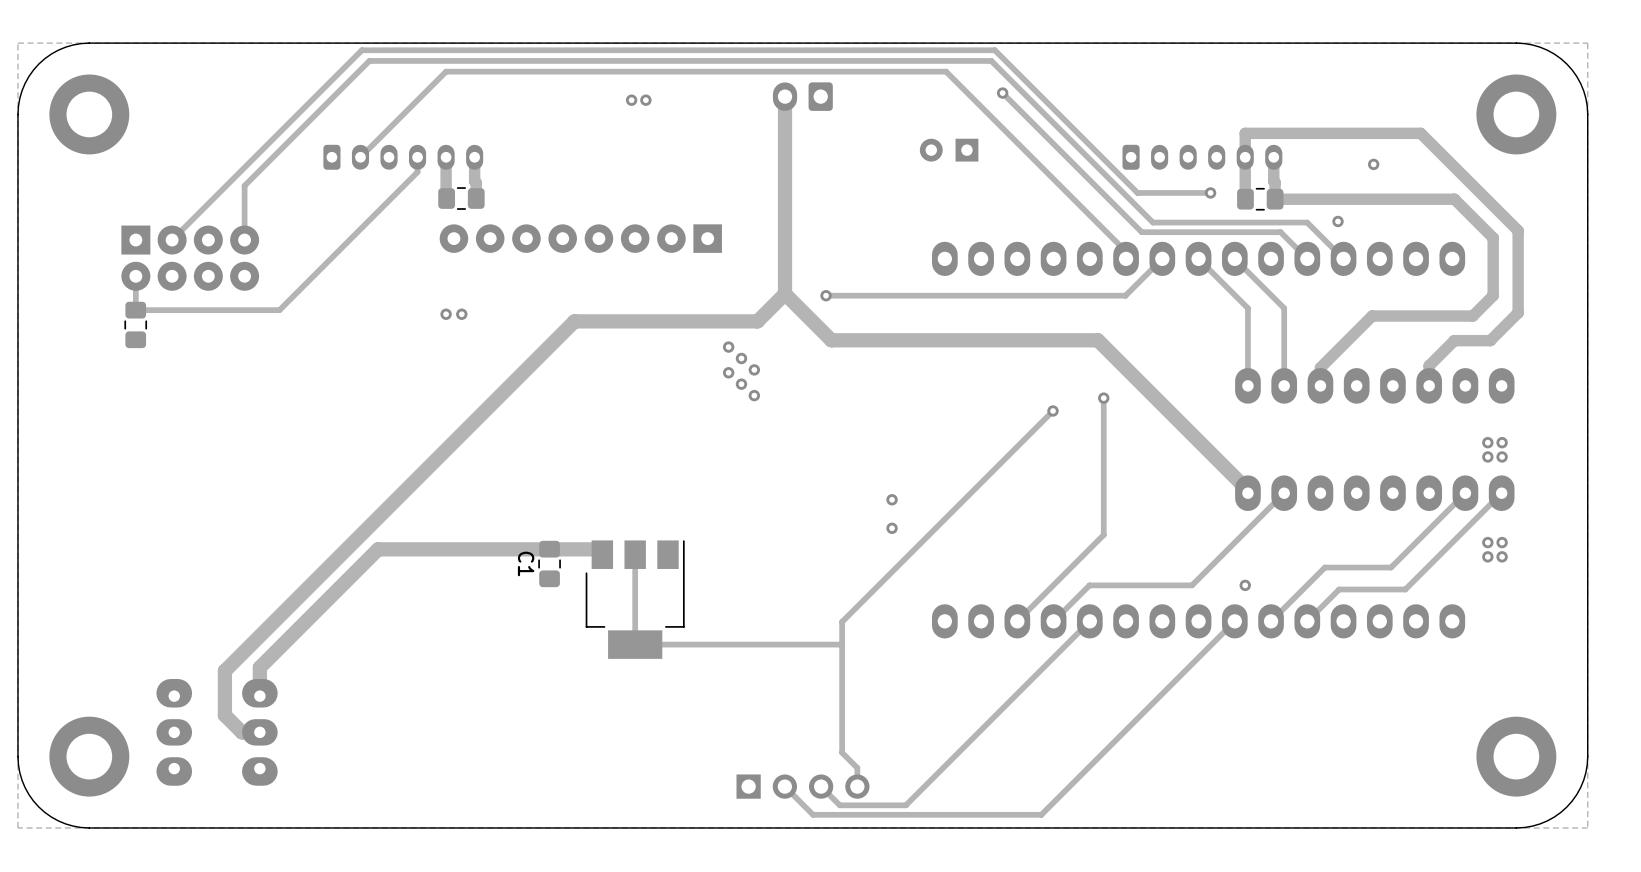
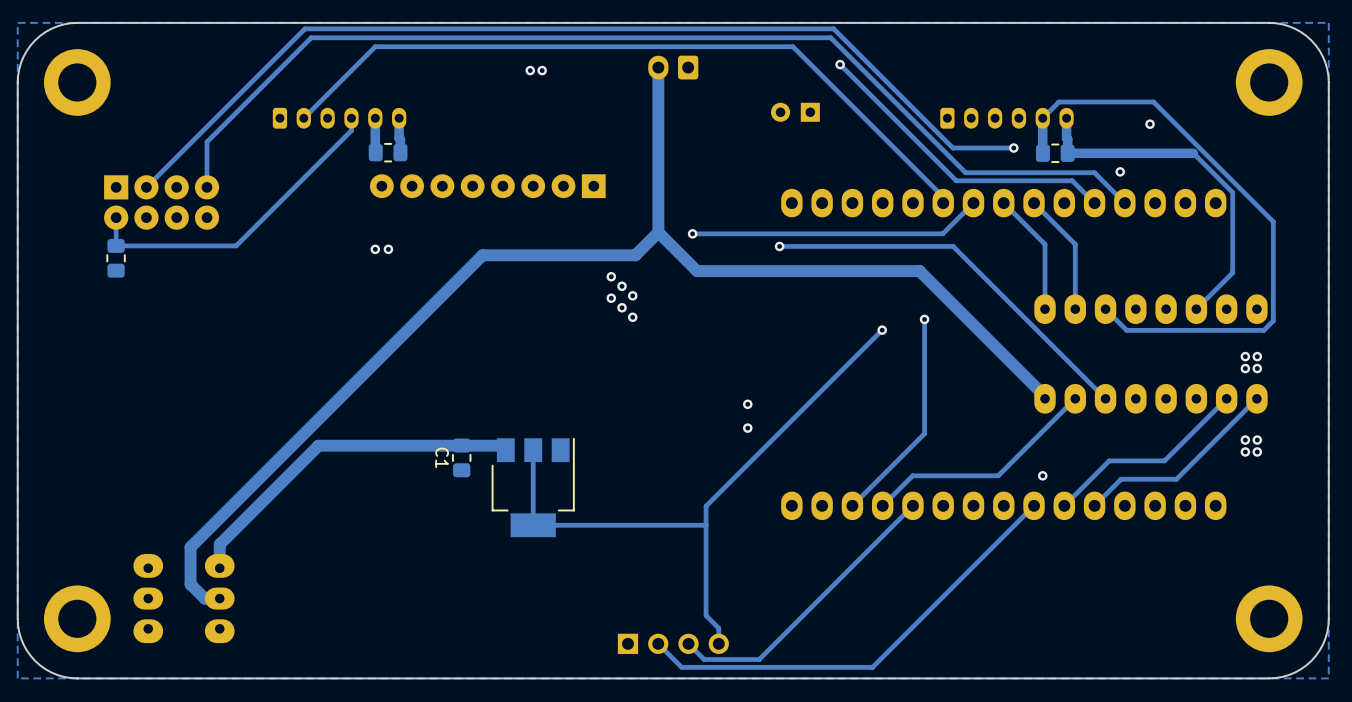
track: (1245, 157) (1245, 133) (1420, 133) (1518, 230) (1518, 312) (1490, 340) (1454, 340) (1429, 365) (1429, 385) -> (1042, 118) (1058, 102) (1153, 102) (1273, 221) (1273, 320) (1263, 330) (1126, 330) (1105, 309)
track: (1425, 199) (1454, 199) (1493, 237) (1493, 295) (1472, 316) (1372, 316) (1320, 367) (1320, 385) -> (1193, 153) (1232, 192) (1232, 272) (1196, 309)
track: none -> (779, 246) (953, 246) (1105, 398)
via: none -> (779, 246)

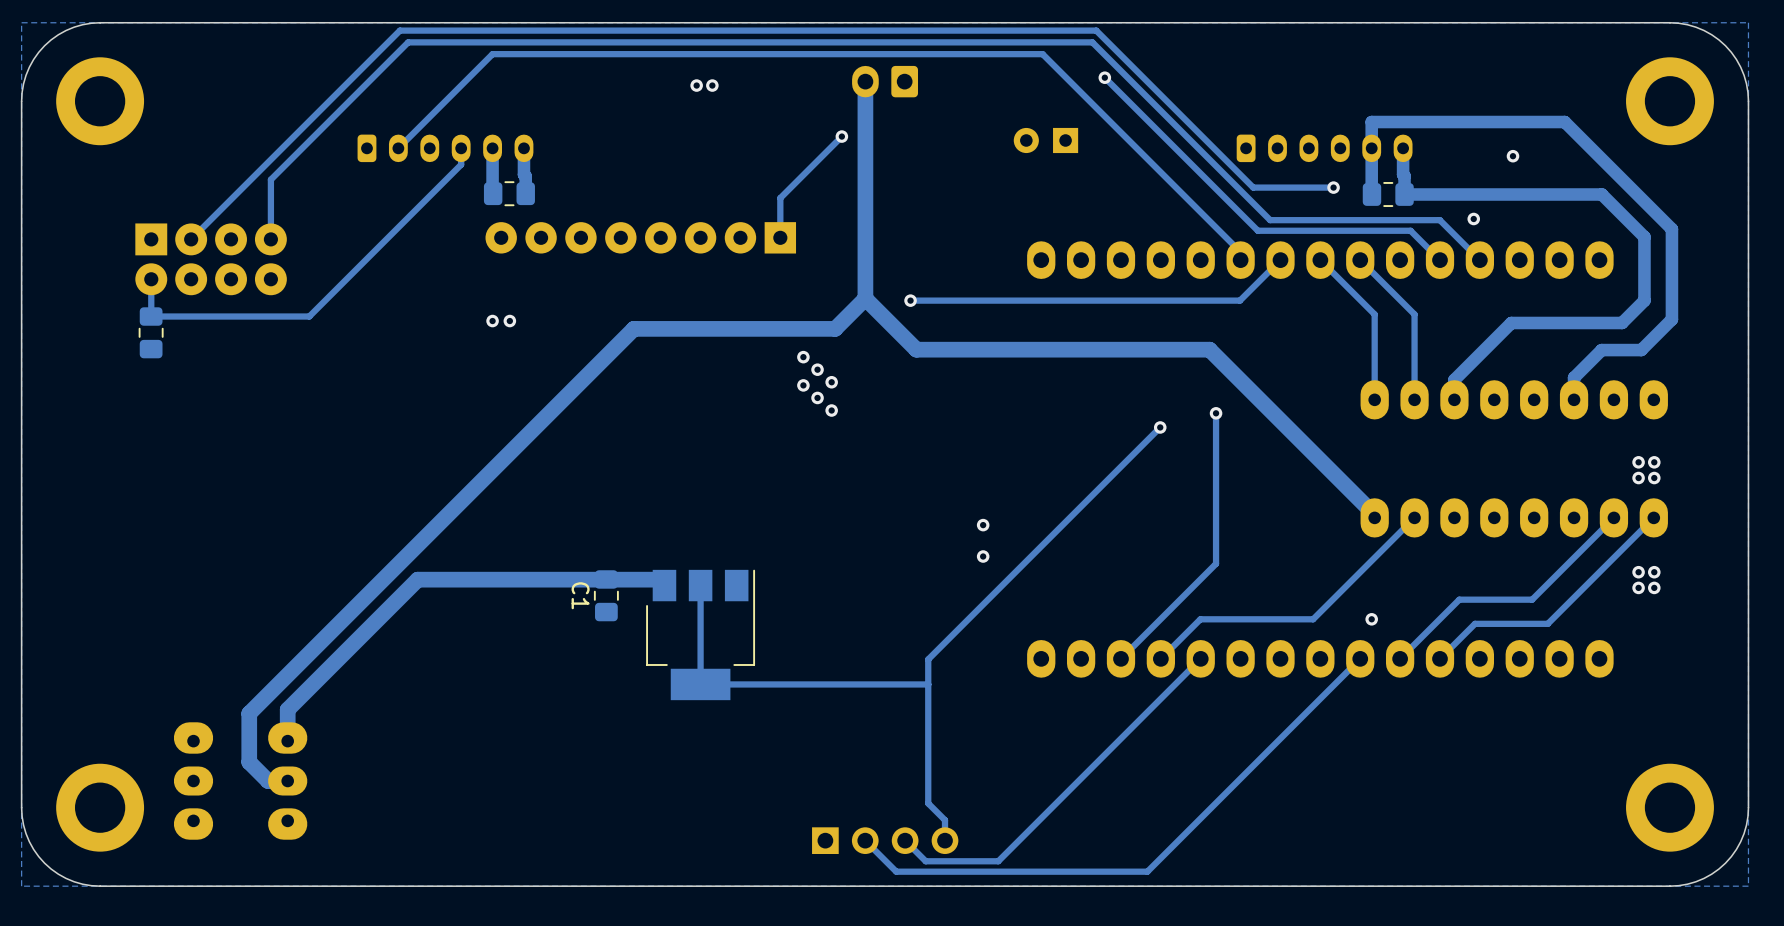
track: none -> (841, 136) (780, 198) (780, 237)
via: none -> (841, 136)
track: (1042, 118) (1058, 102) (1153, 102) (1273, 221) (1273, 320) (1263, 330) (1126, 330) (1105, 309) -> (1371, 148) (1371, 122) (1564, 122) (1671, 229) (1671, 319) (1641, 350) (1601, 350) (1574, 377) (1574, 399)
track: (1193, 153) (1232, 192) (1232, 272) (1196, 309) -> (1570, 194) (1601, 194) (1644, 237) (1644, 300) (1622, 322) (1511, 322) (1454, 379) (1454, 399)
track: (779, 246) (953, 246) (1105, 398) -> none
via: (779, 246) -> none

